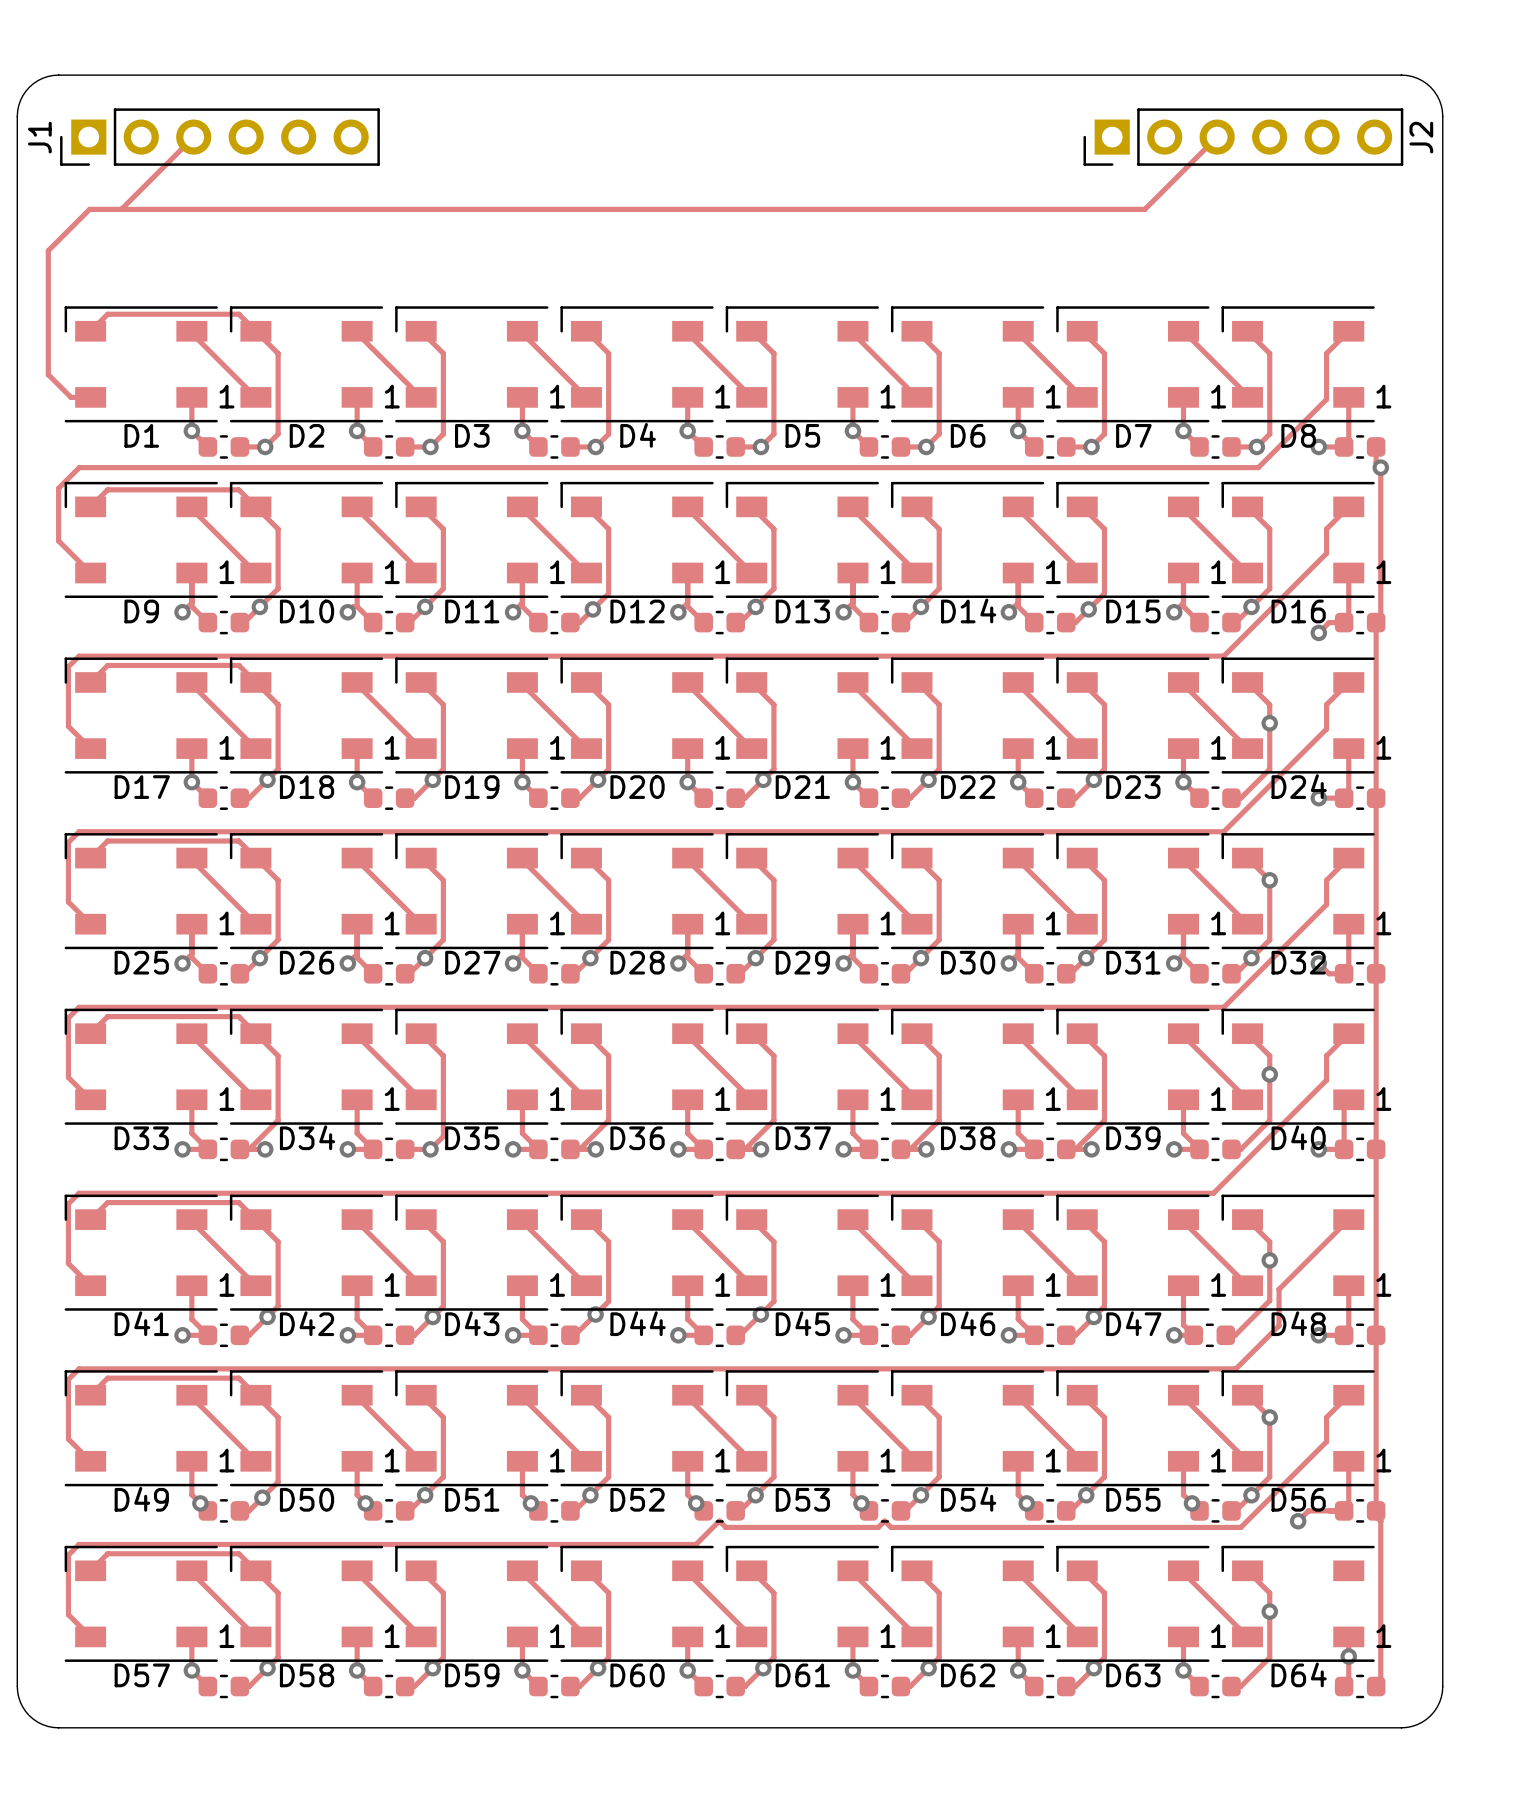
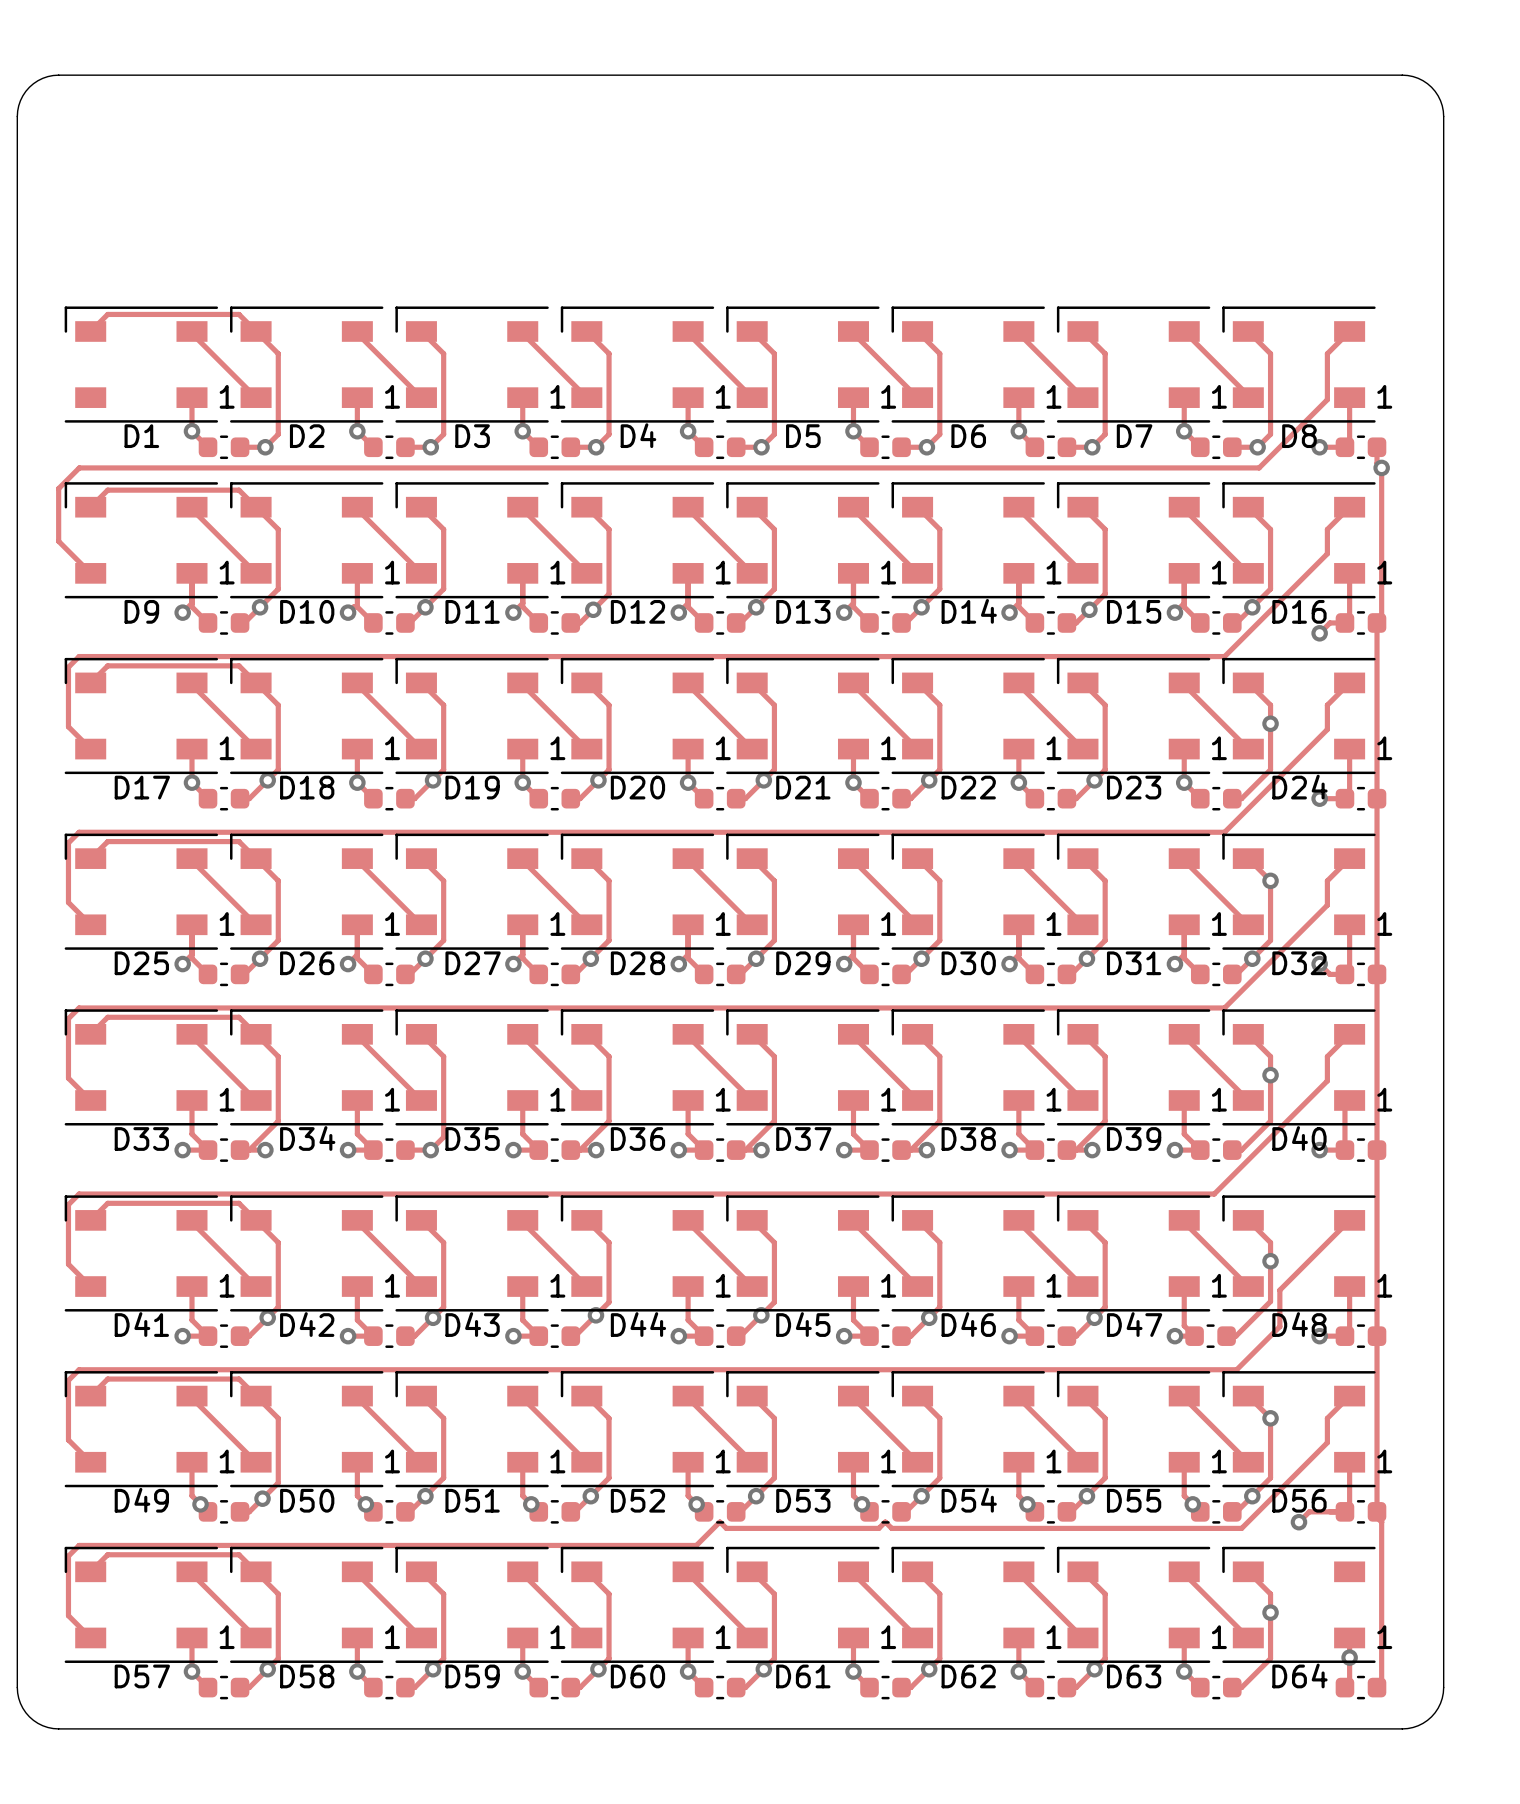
track: (193, 137) (121, 209) -> none
J1: (219, 137) -> none
track: (1217, 137) (1144, 209) (89, 209) (48, 250) (48, 374) (71, 397) (90, 397) -> none
J2: (1243, 137) -> none

